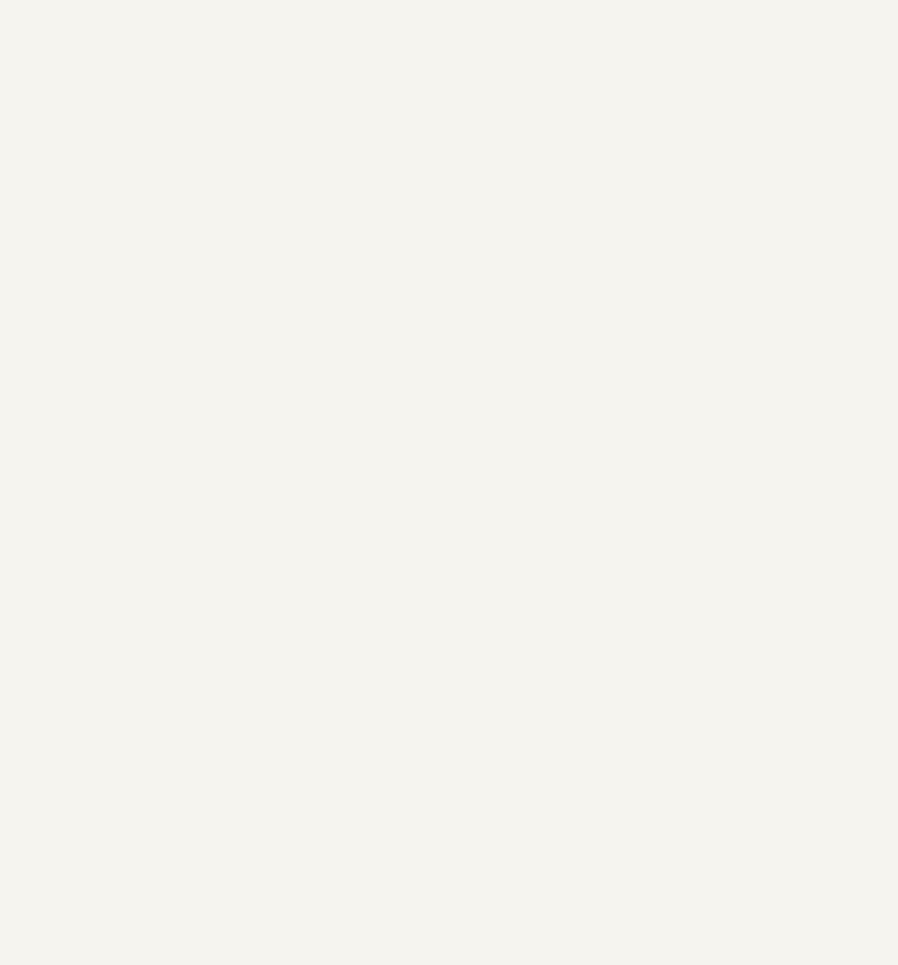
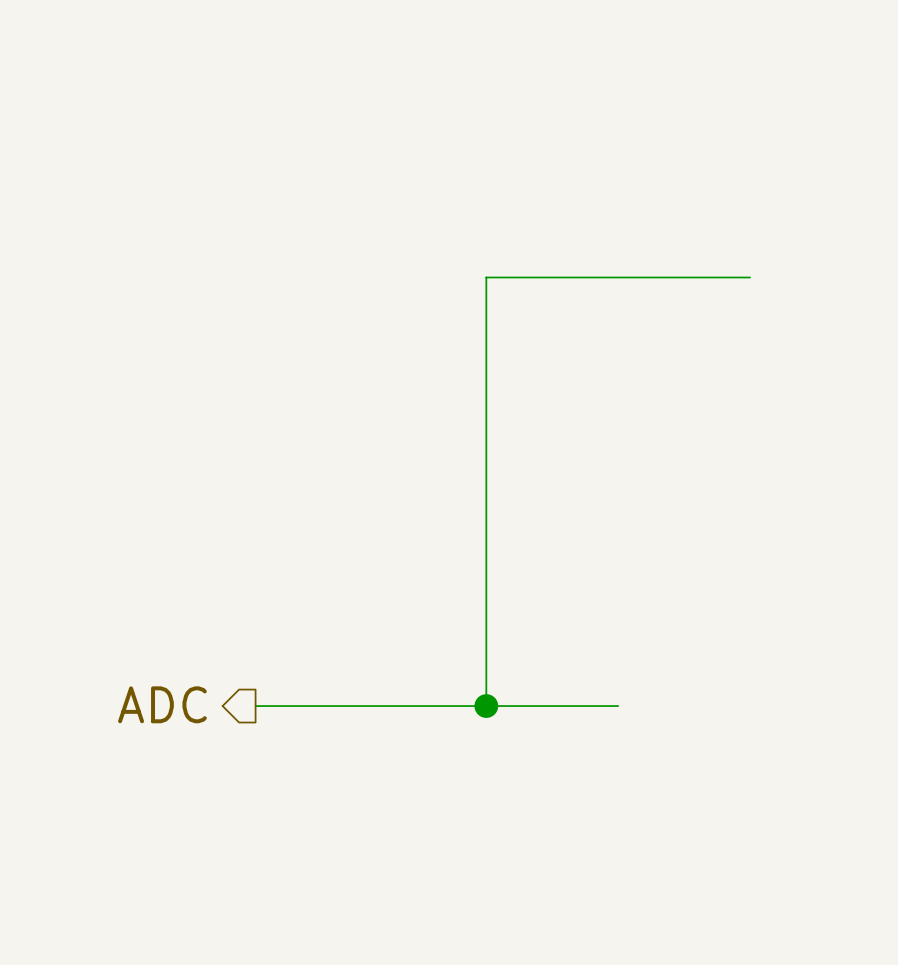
wire: none -> (750, 277) (486, 277) (486, 706)
hierarchical label: none -> ADC (162, 704)
wire: none -> (255, 706) (618, 706)
junction: none -> (486, 706)

